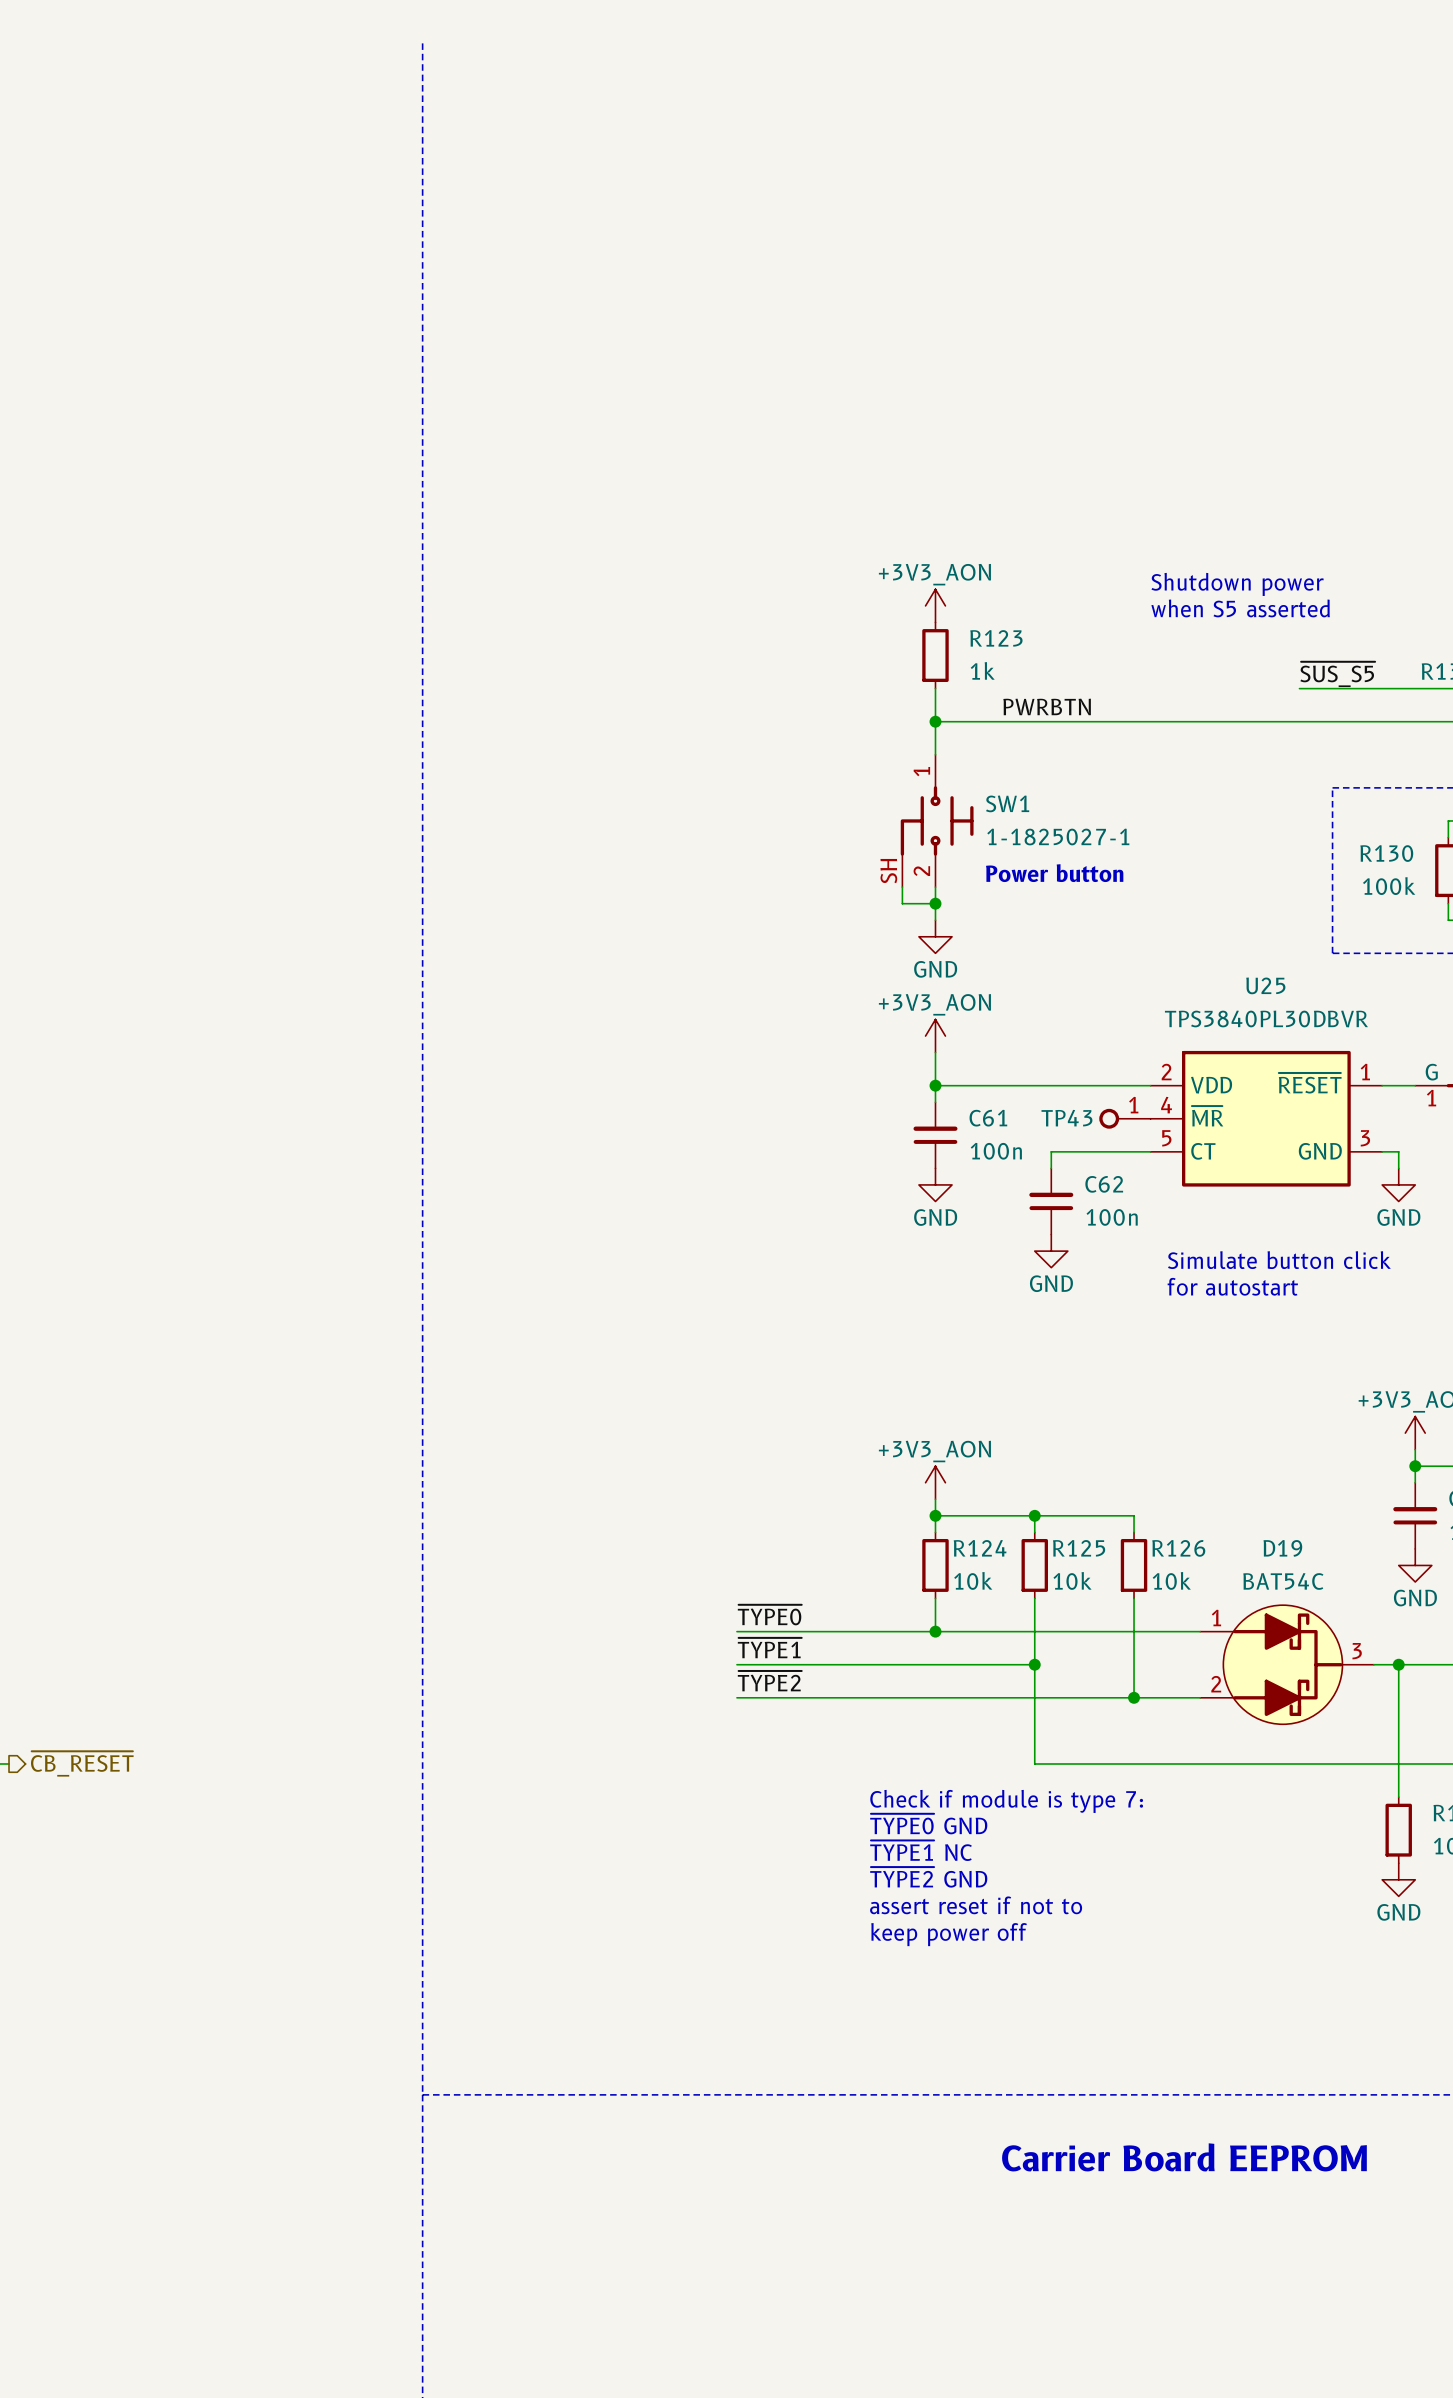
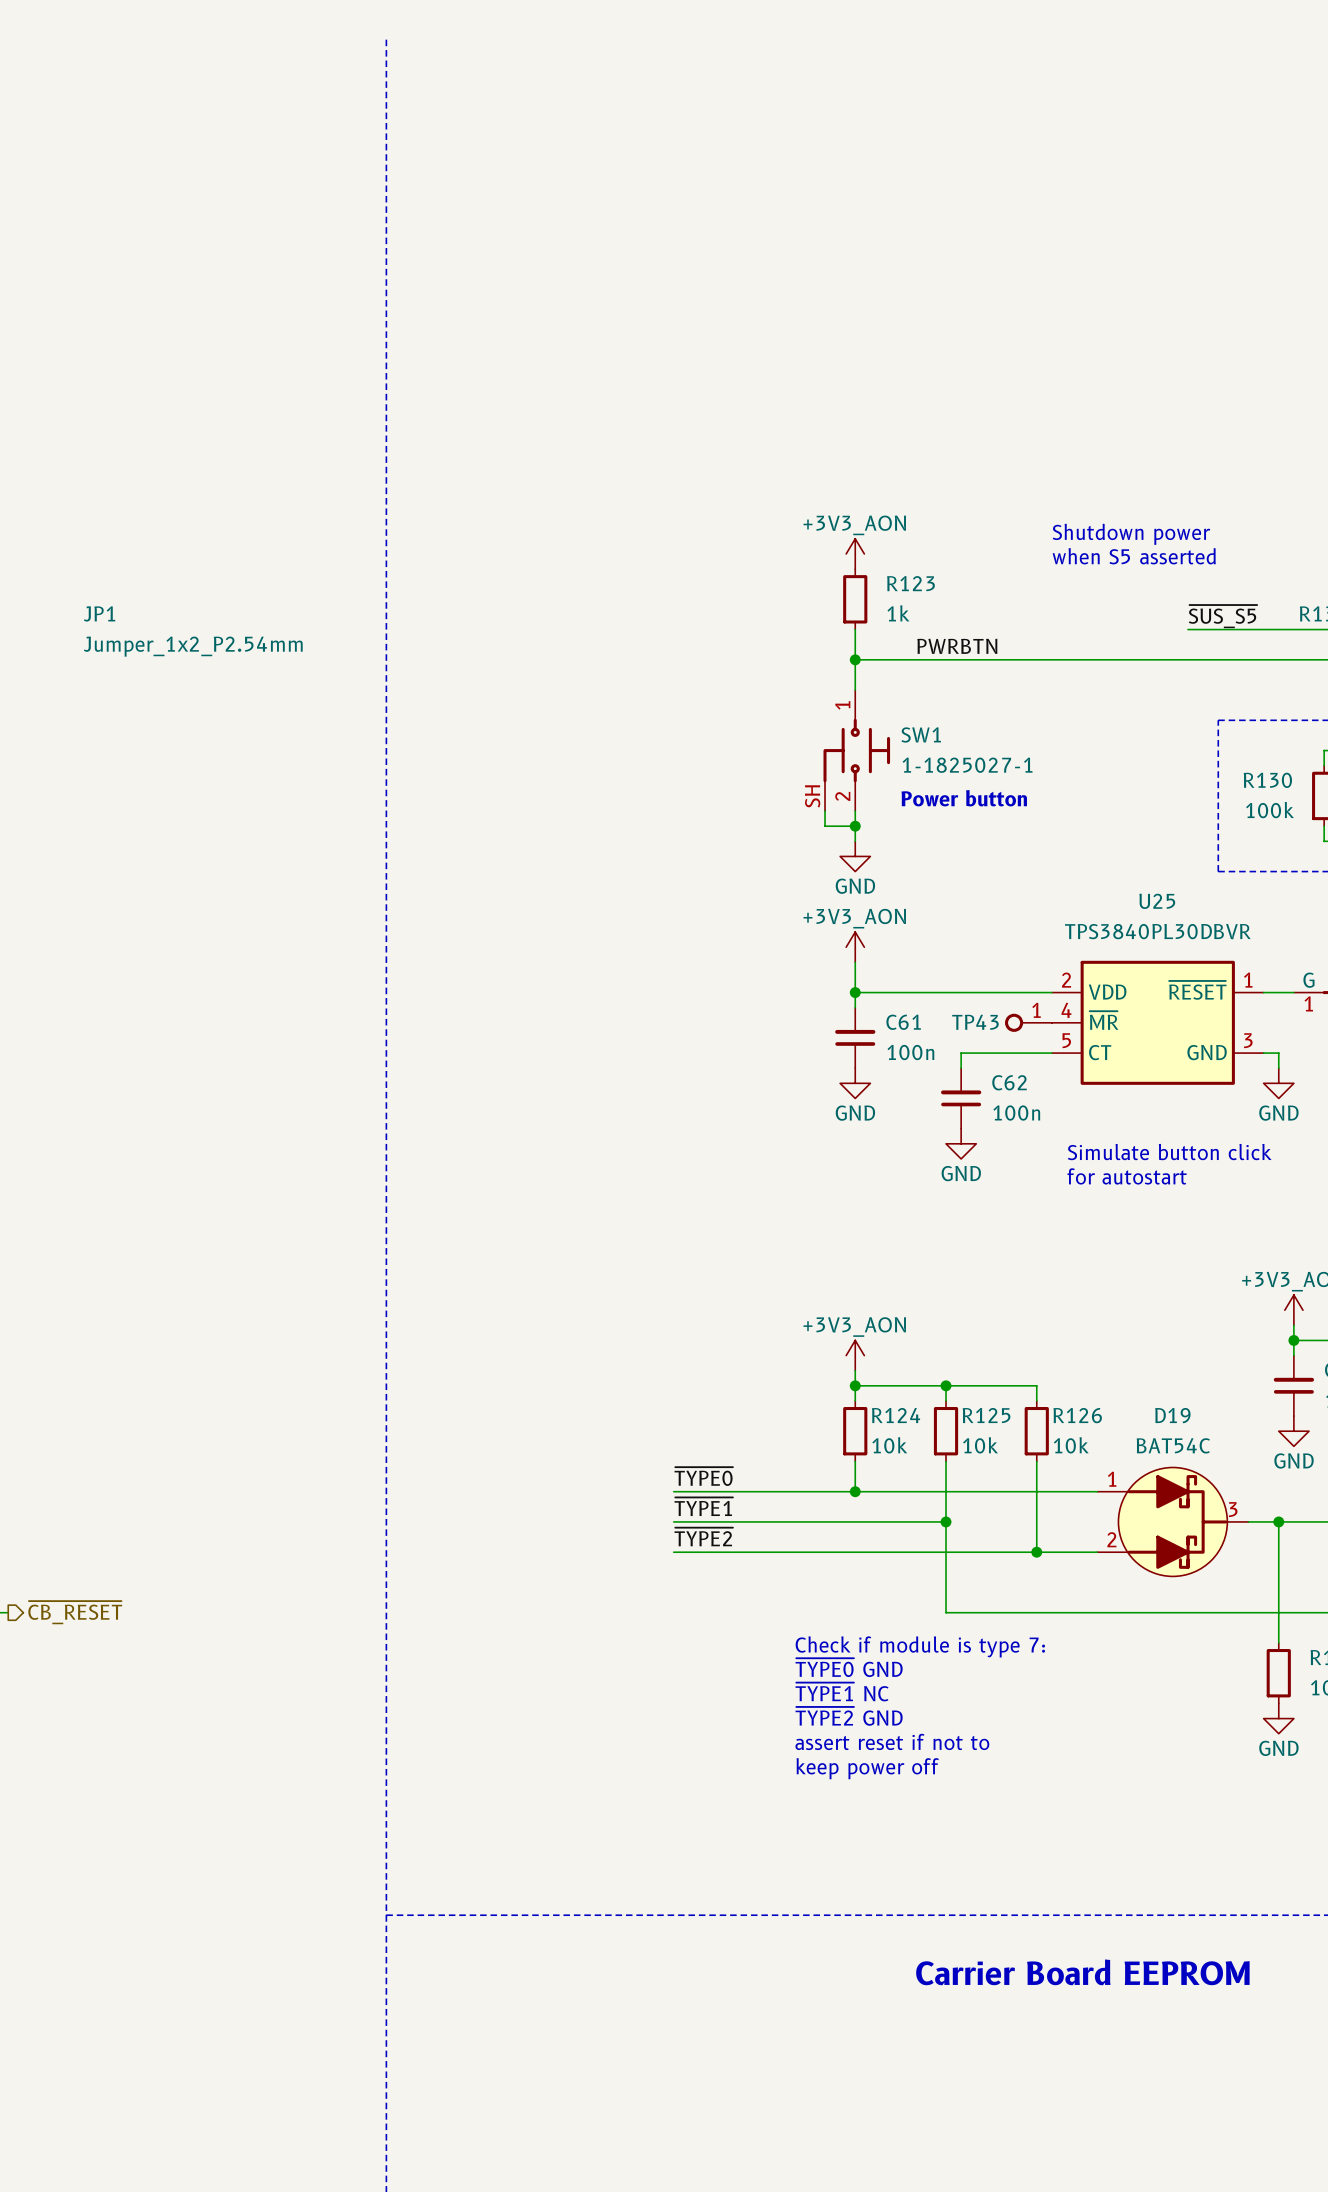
JP1: none -> Jumper_1x2_P2.54mm (193, 631)
D19 symbol: [1200, 1605, 1374, 1725] -> [1097, 1467, 1249, 1577]

